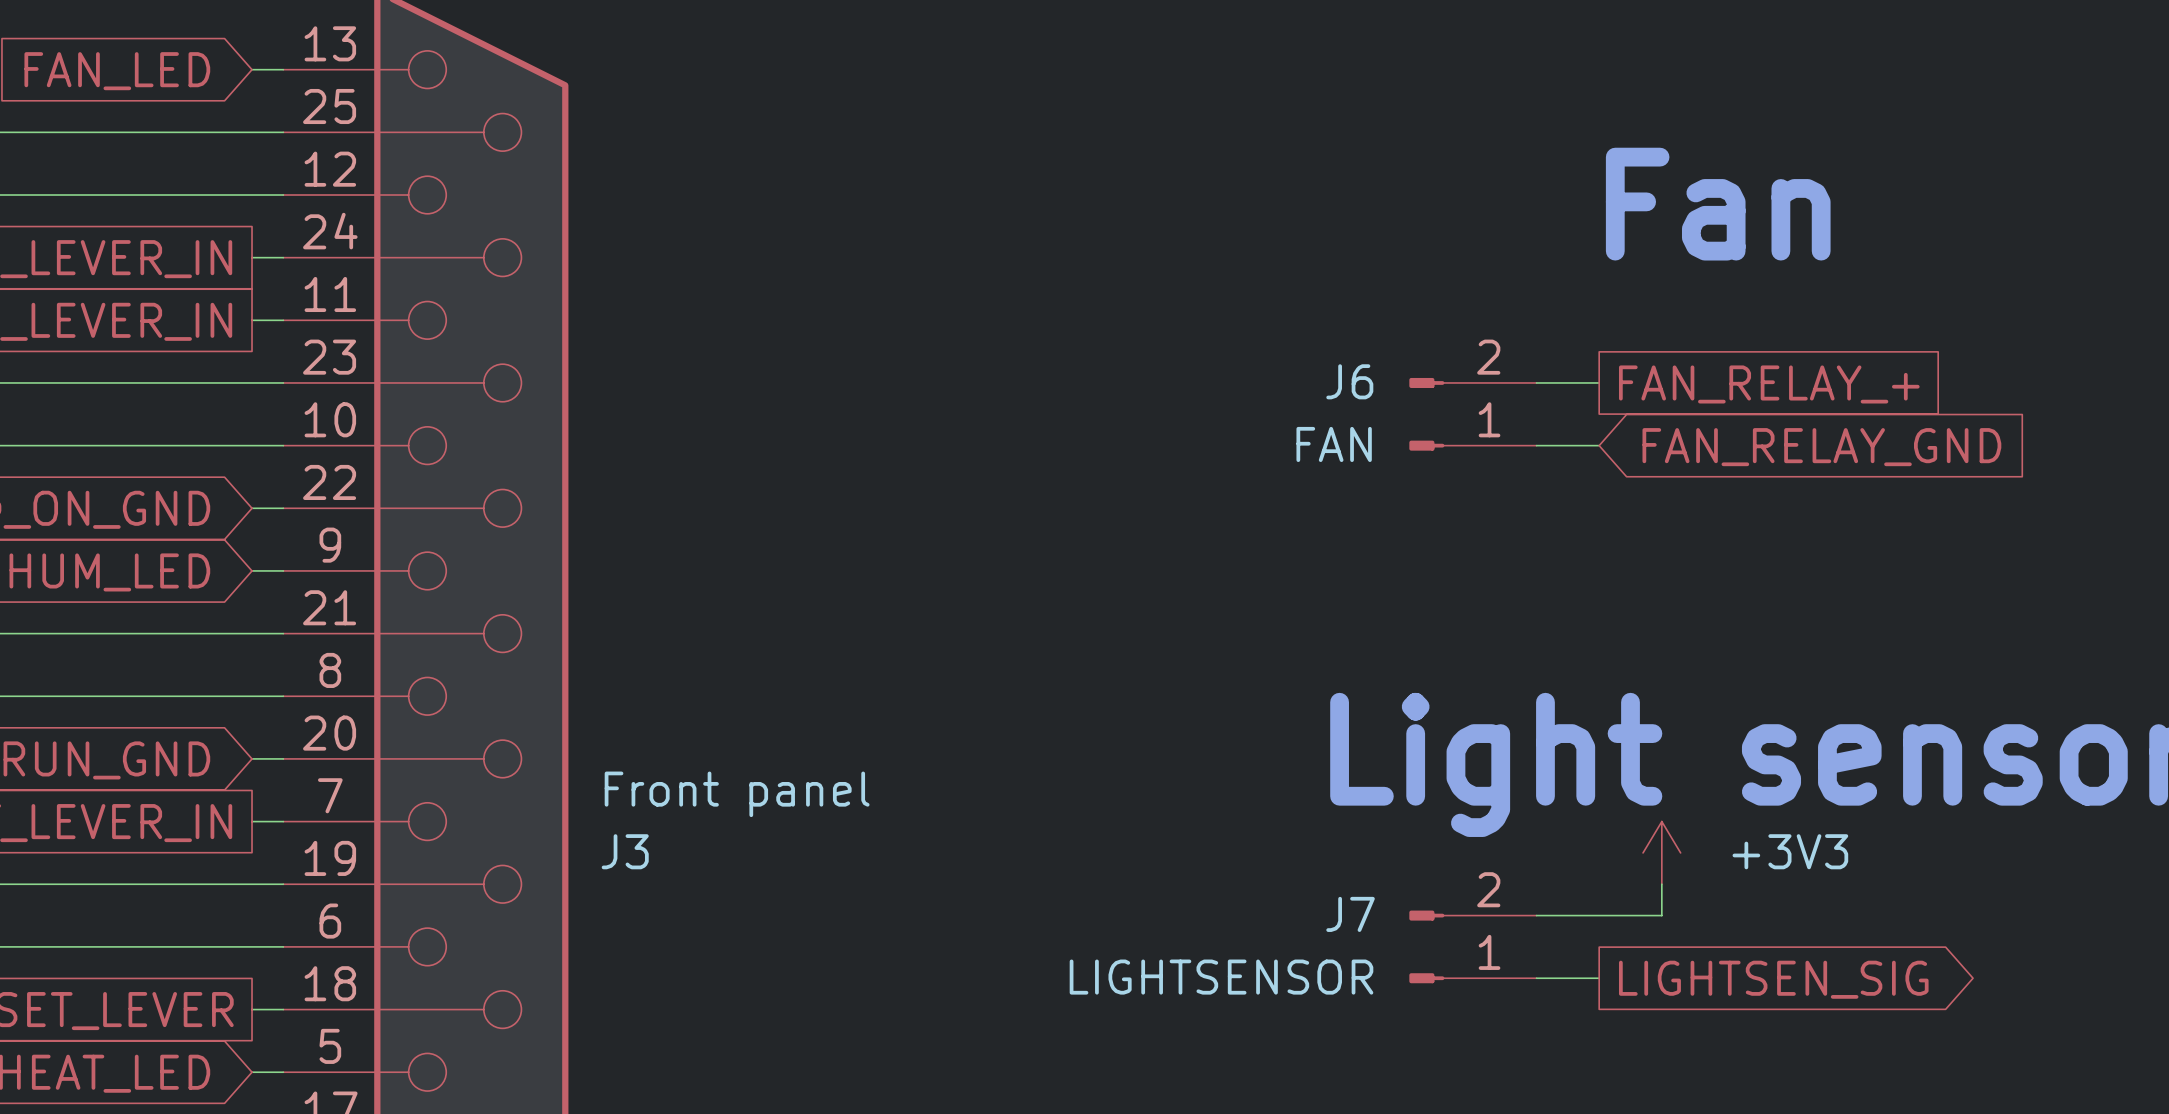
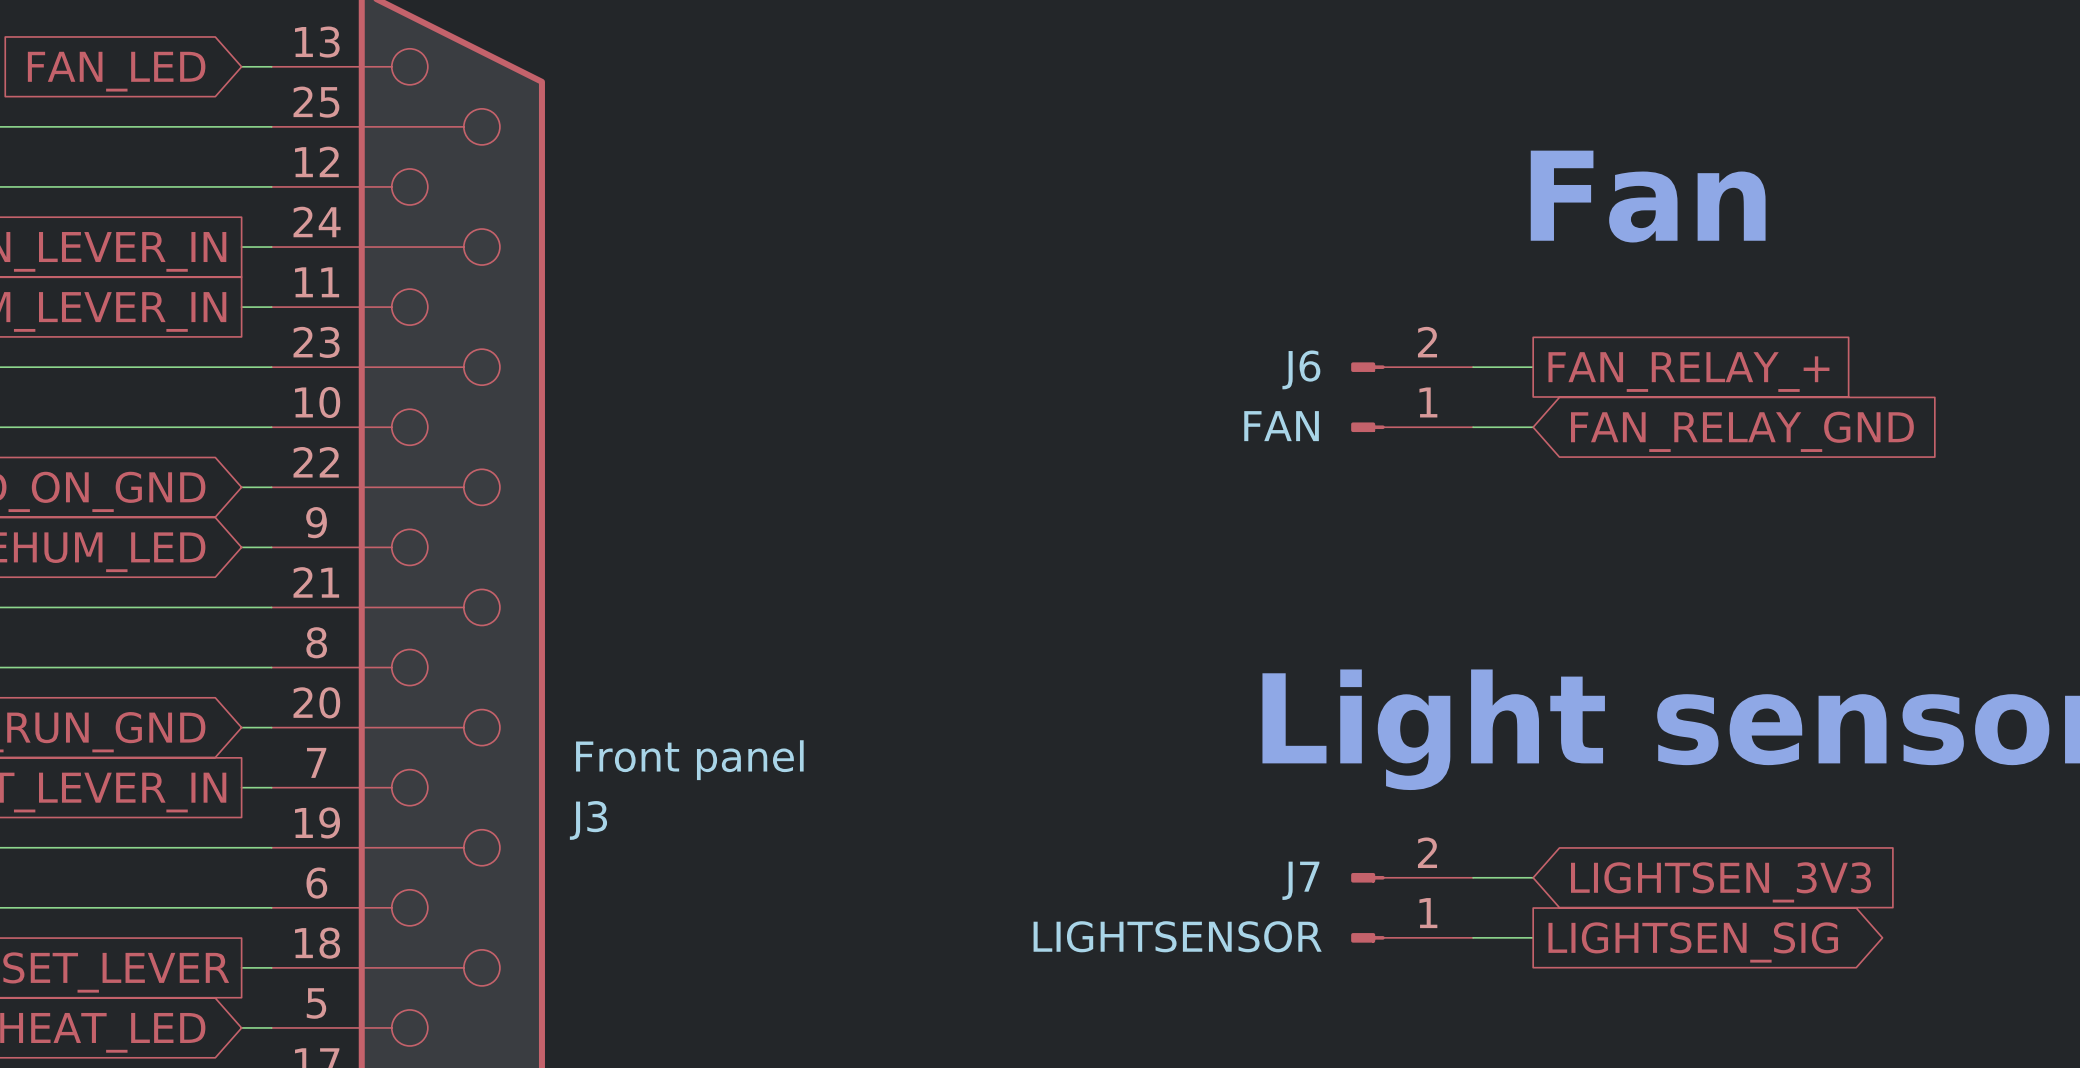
power symbol: +3V3 (1661, 852) -> none
wire: (1661, 884) (1661, 915) (1599, 915) -> none
global label: none -> LIGHTSEN_3V3 (1721, 882)

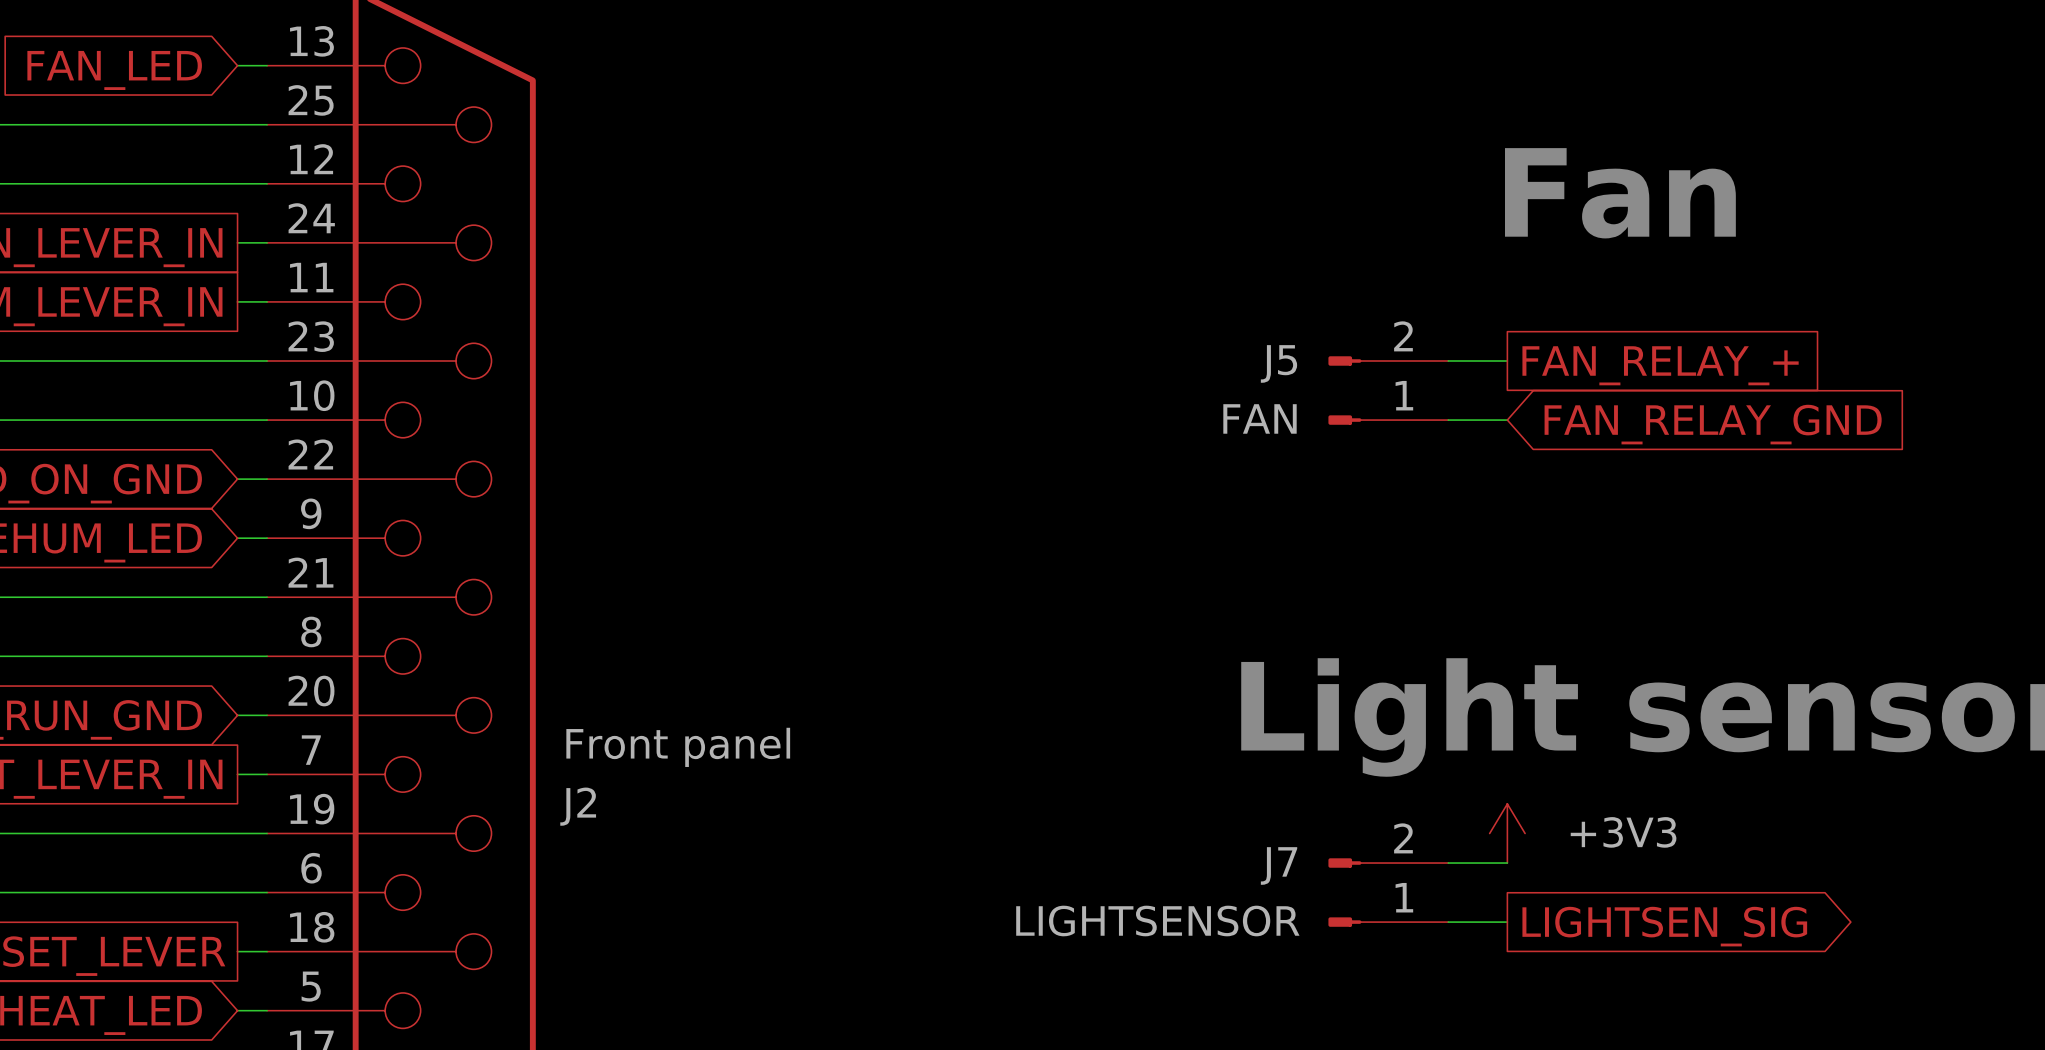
J6 name: J6 (1301, 369) -> J5 (1278, 363)
J3 name: J3 (588, 820) -> J2 (578, 806)
power symbol: none -> +3V3 (1507, 833)
global label: LIGHTSEN_3V3 (1721, 882) -> none

